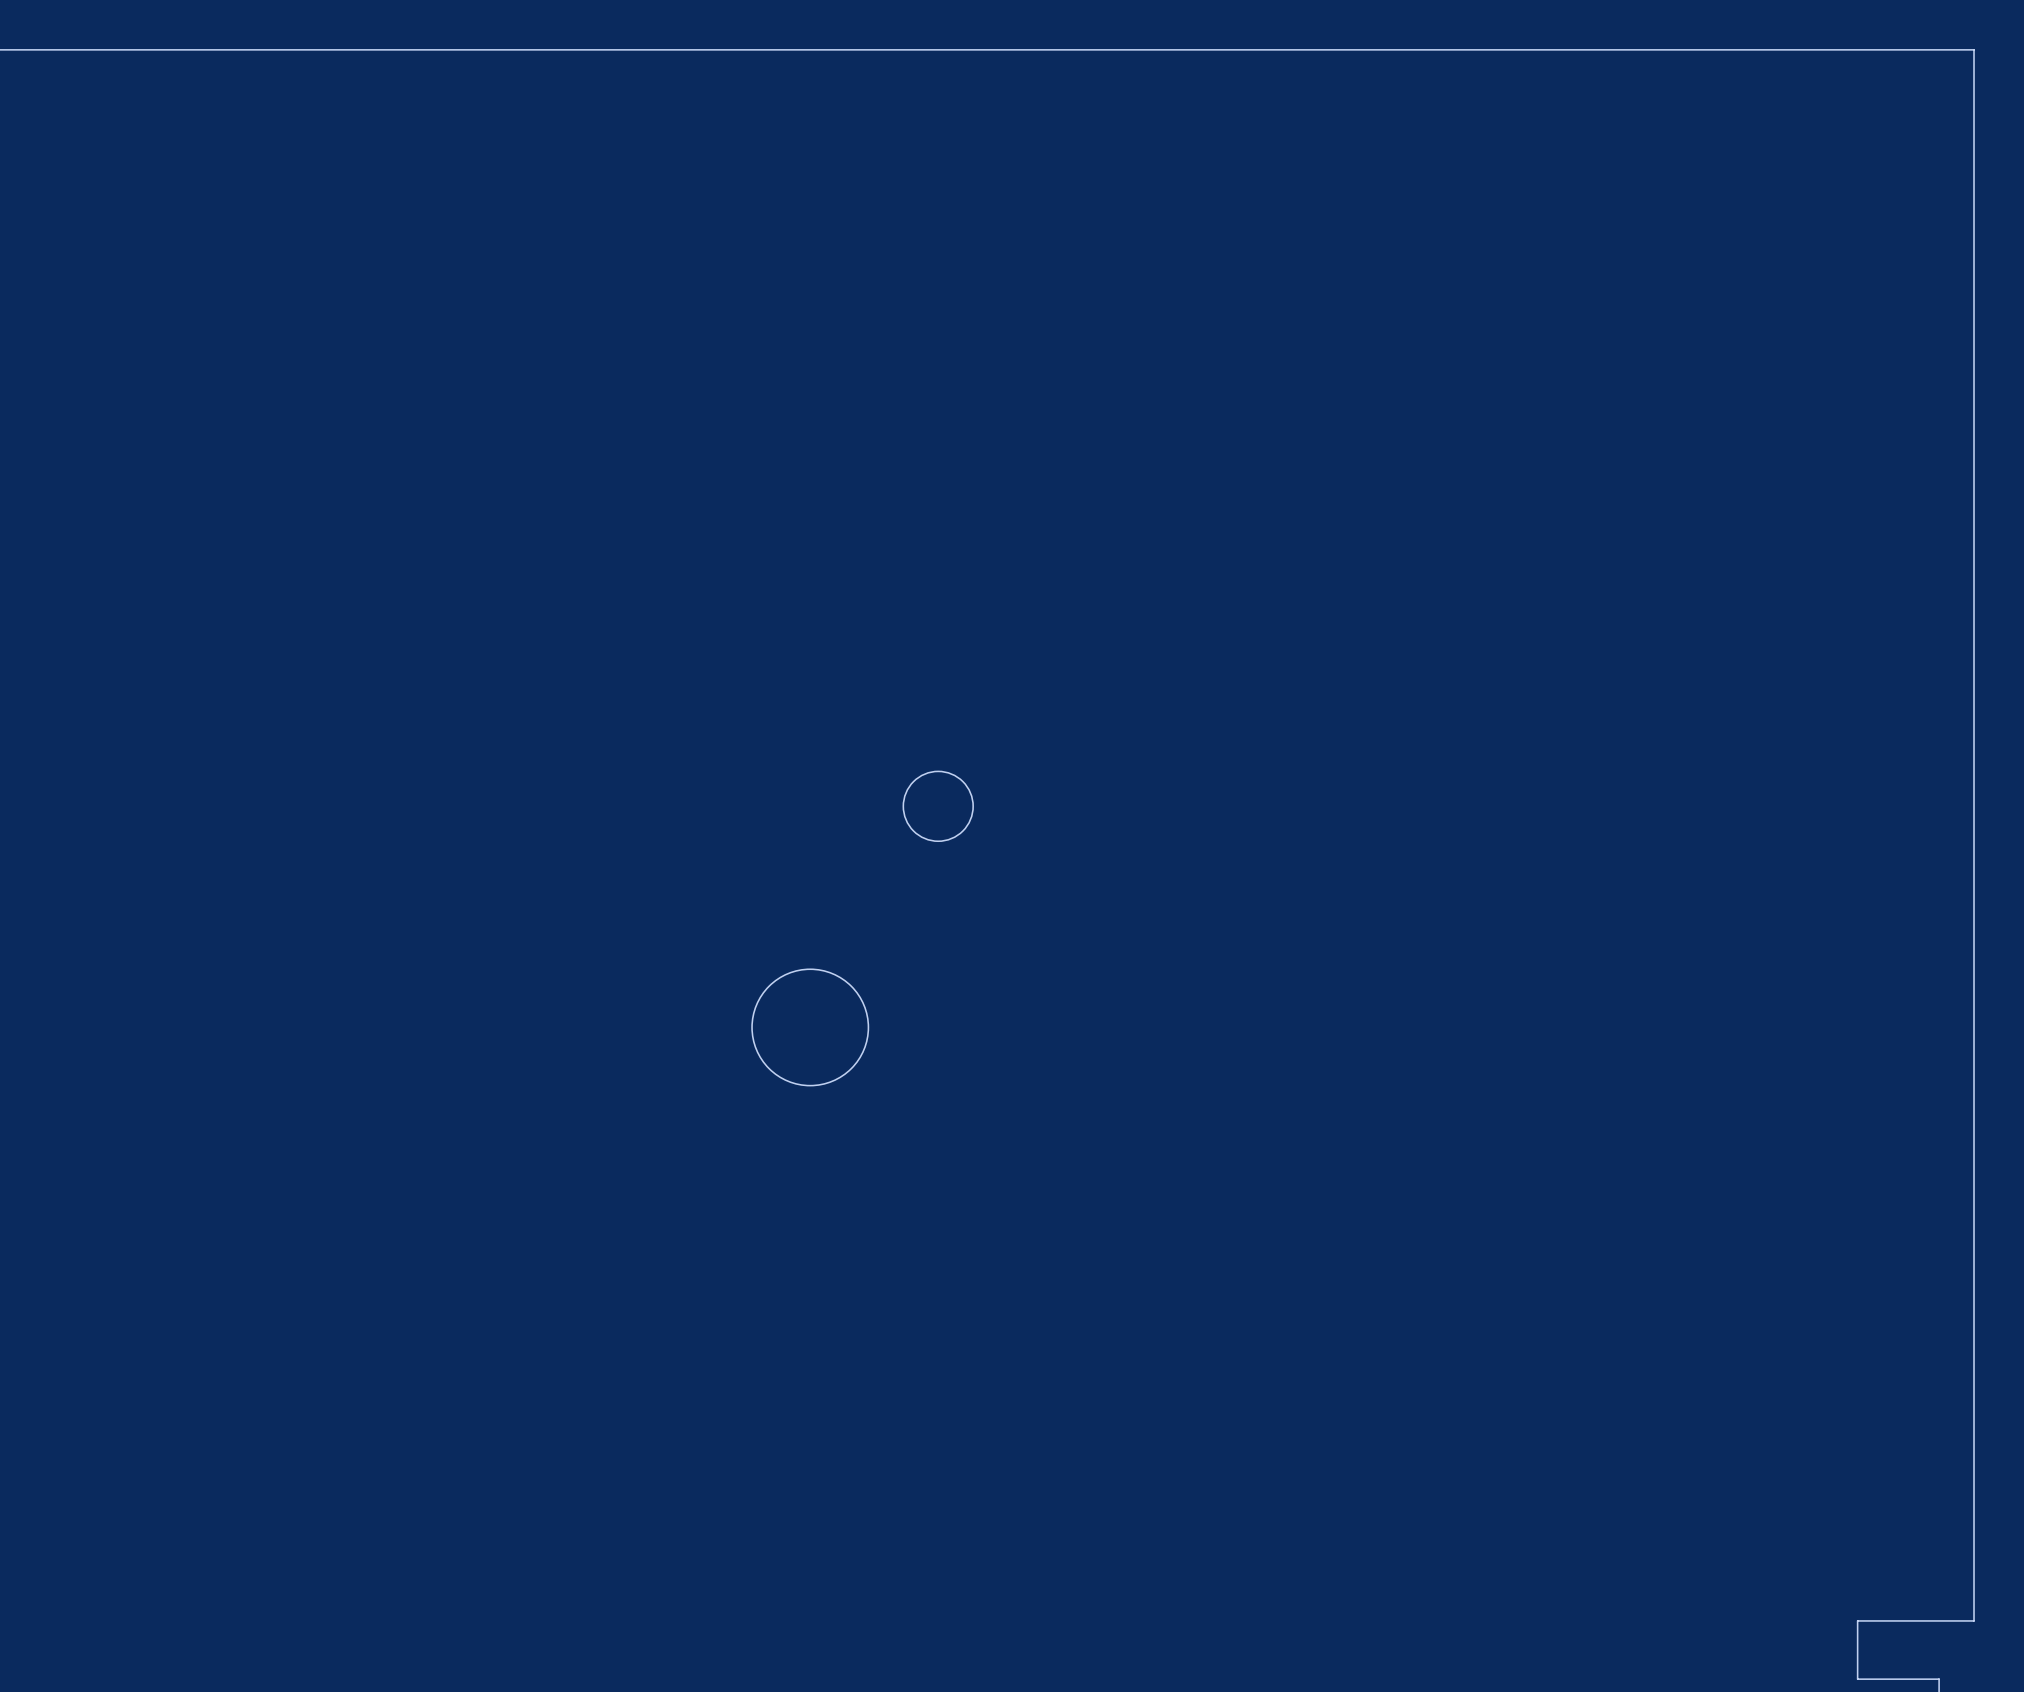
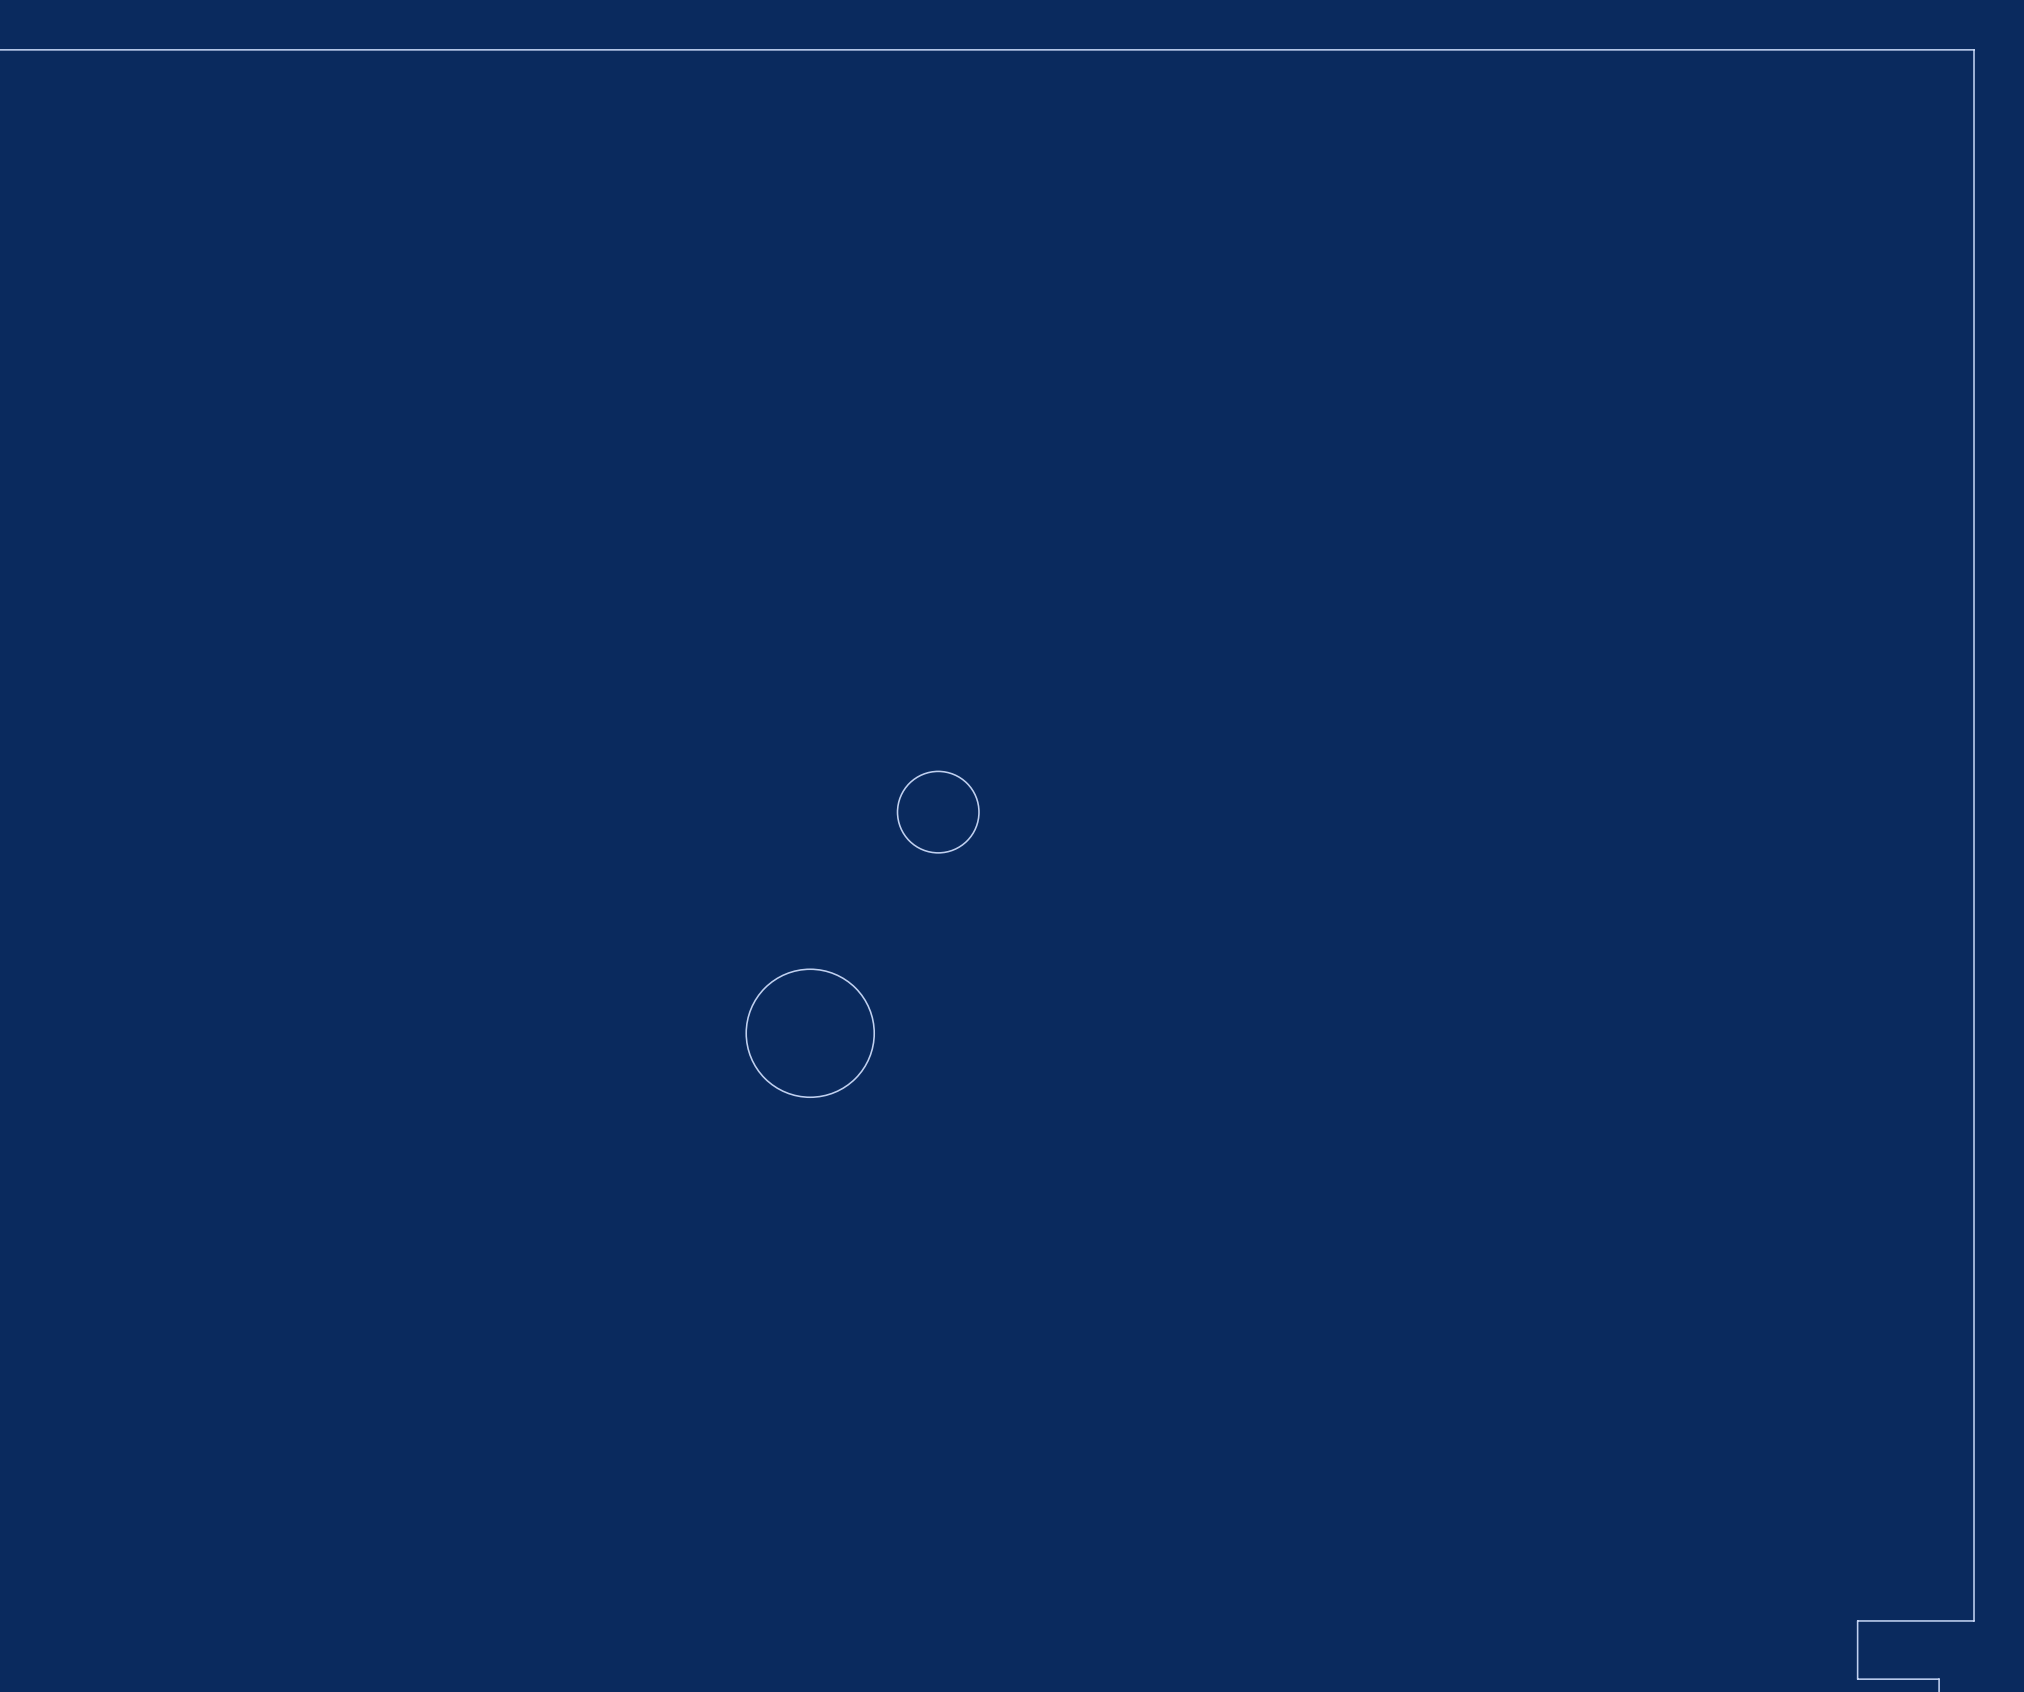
round board edge size: [902, 770, 974, 842] -> [896, 770, 980, 854]
round board edge size: [751, 968, 869, 1087] -> [745, 968, 875, 1098]

